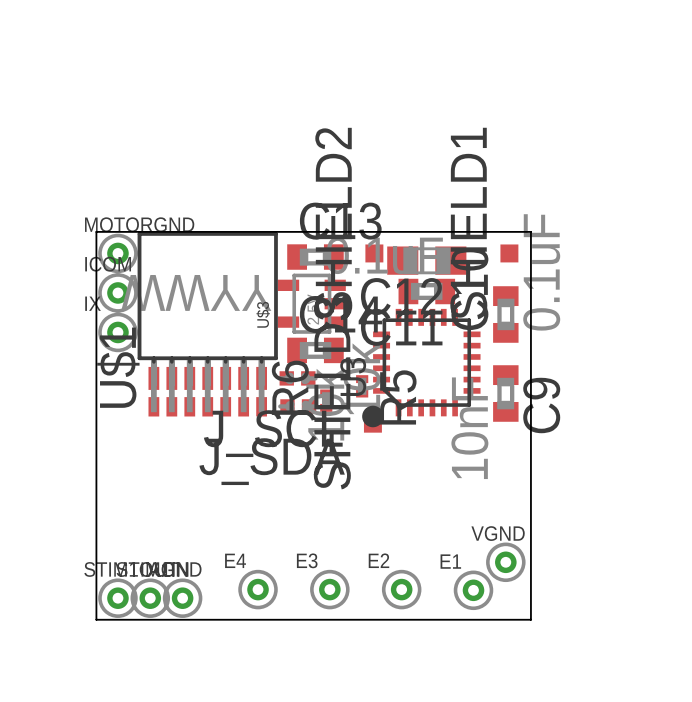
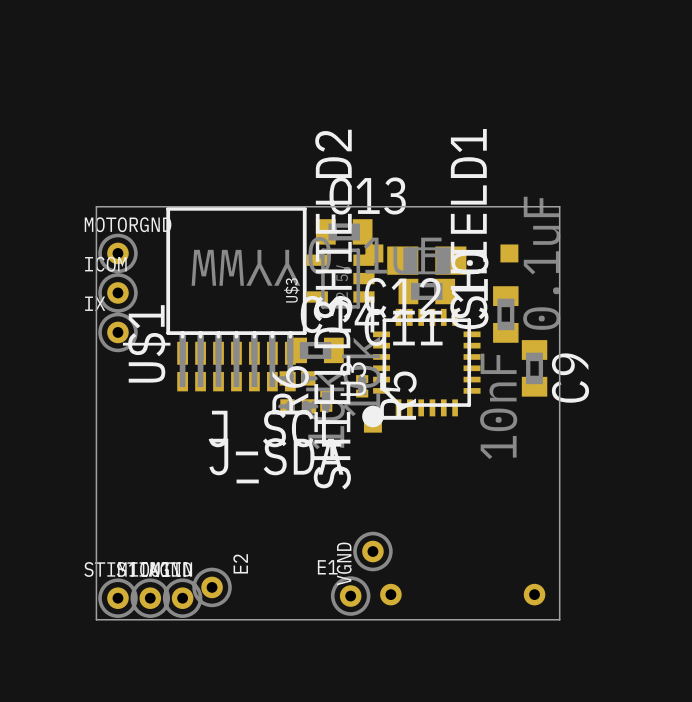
board edge: (96, 231) (530, 231) (530, 619) -> (96, 231) (96, 206) (559, 206) (559, 619) (530, 619)
C13 position: (315, 257) -> (344, 231)
U$3 position: (311, 303) -> (340, 278)
U$1 position: (207, 324) -> (236, 299)
C9 position: (505, 393) -> (534, 368)
VGND name rotation: 0° (498, 533) -> 90° counterclockwise (344, 563)
E2 name rotation: 0° (378, 560) -> 90° counterclockwise (240, 563)
E2 name position: E2 (378, 560) -> E2 (240, 563)
VGND position: (505, 562) -> (372, 551)
E4 side: top (258, 589) -> bottom (390, 594)
E3 side: top (329, 589) -> bottom (534, 594)
E2 position: (401, 589) -> (212, 587)
E1 position: (473, 590) -> (350, 596)

